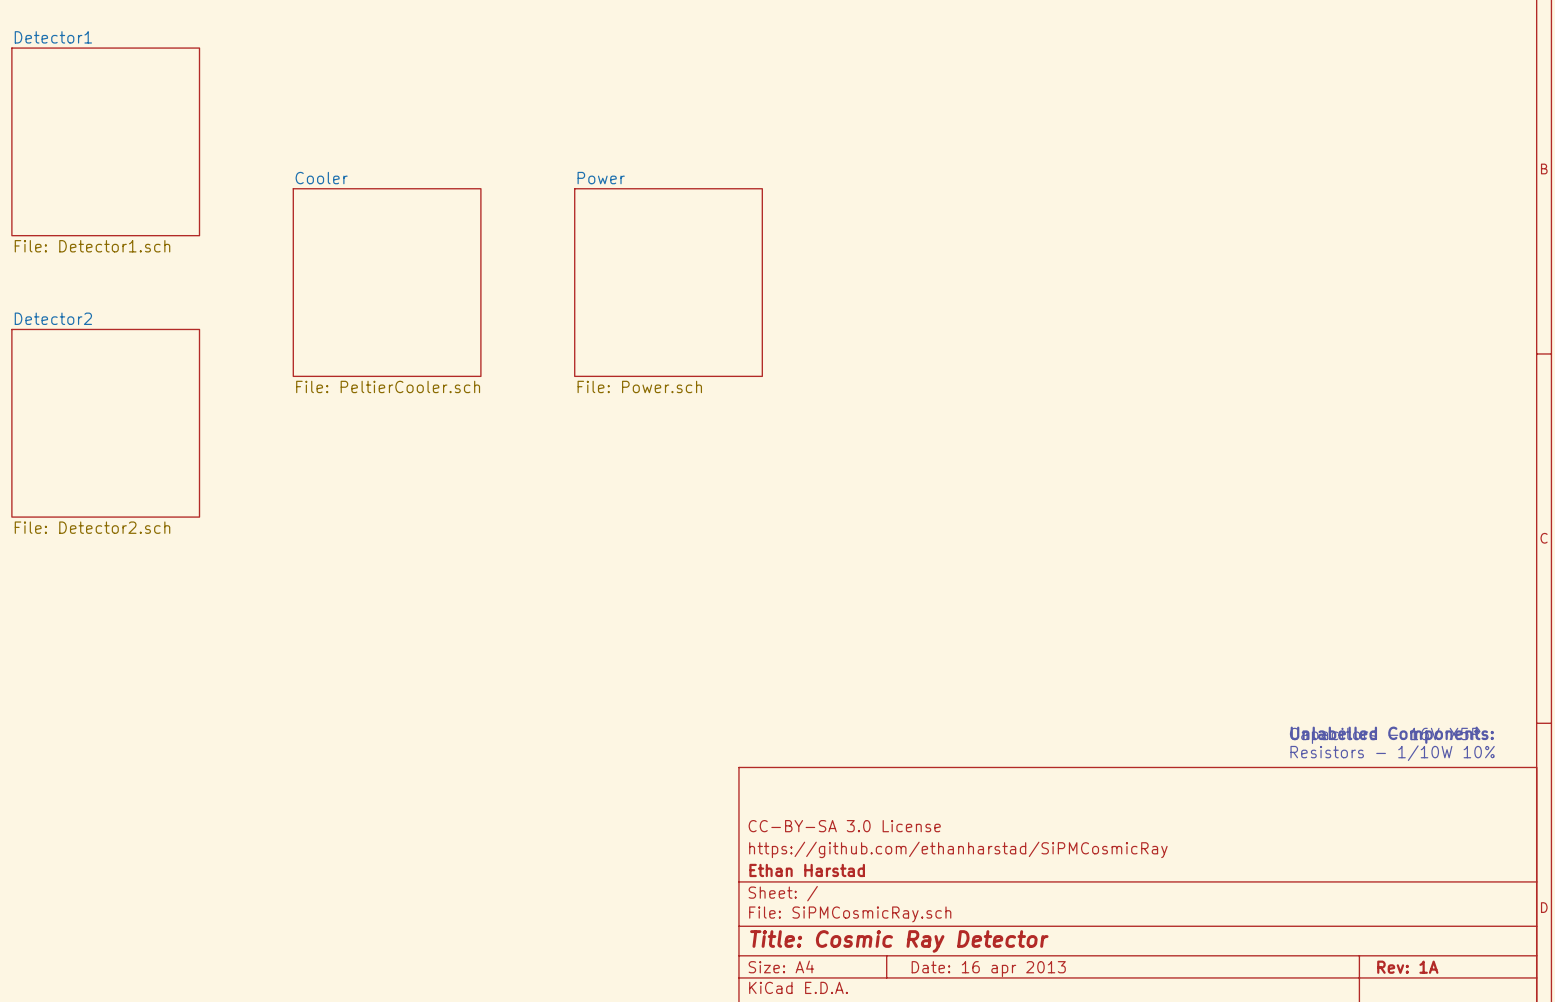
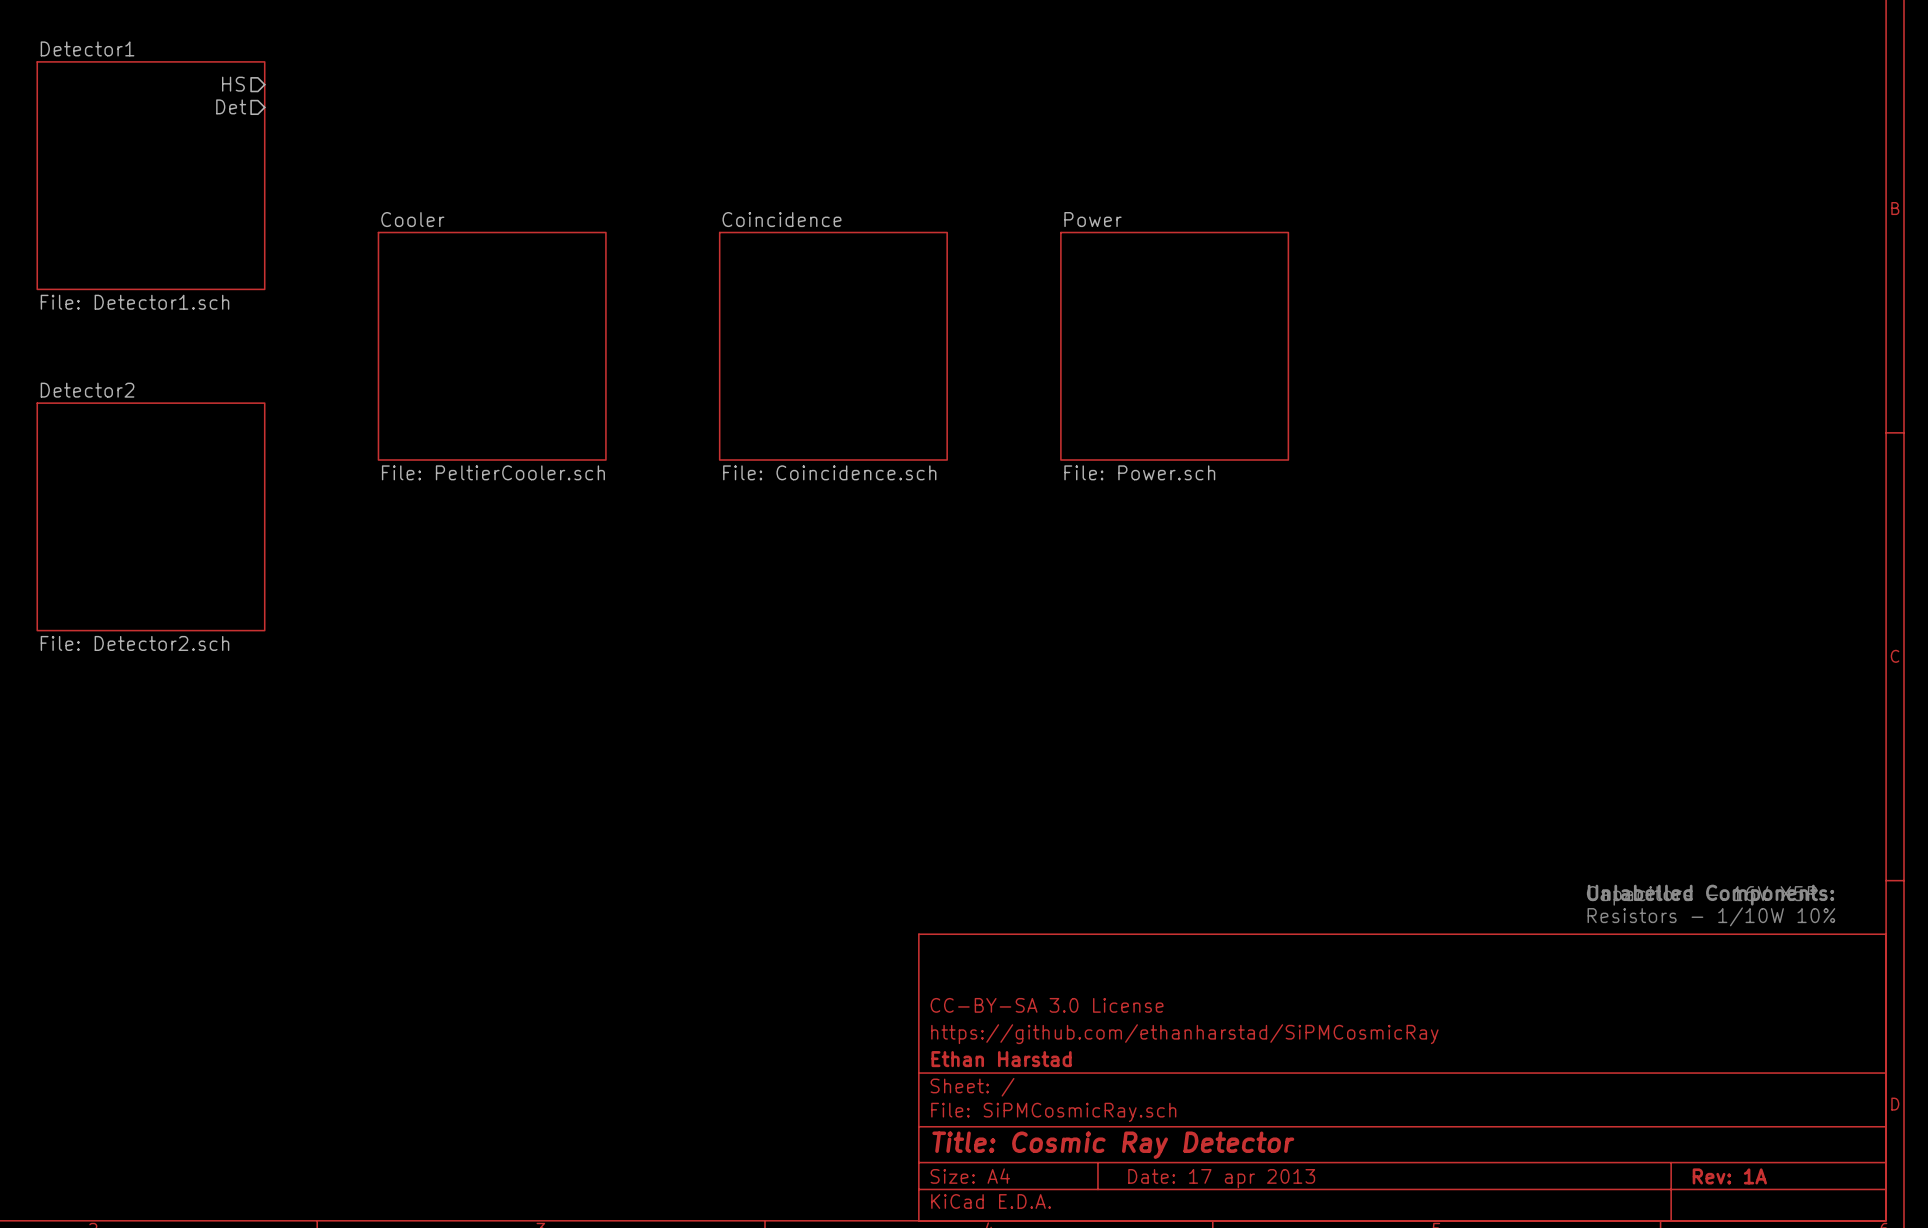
sheet pin: none -> HS (233, 84)
sheet pin: none -> Det (231, 106)
sheet Power name: Power (601, 178) -> Coincidence (781, 219)
sheet Power: none -> File: Power.sch (1174, 346)
sheet Power value: File: Power.sch (639, 386) -> File: Coincidence.sch (829, 472)
title block: Date: 16 apr 2013 (988, 969) -> Date: 17 apr 2013 (1221, 1178)

